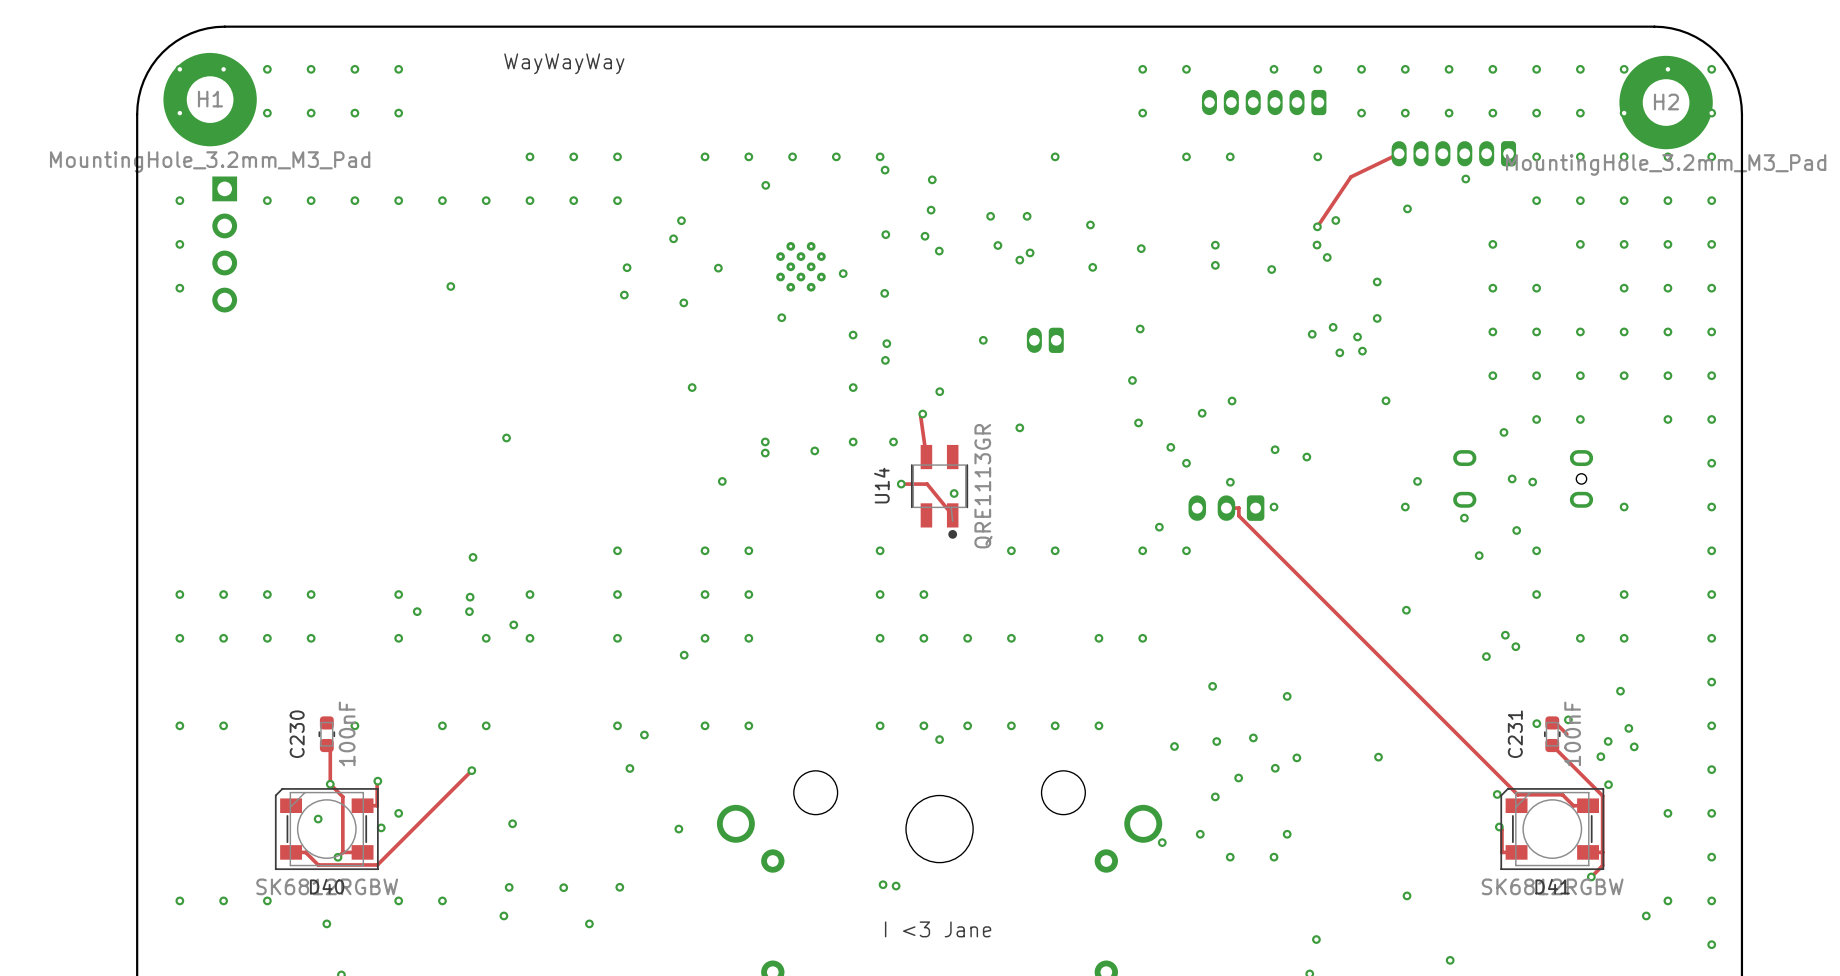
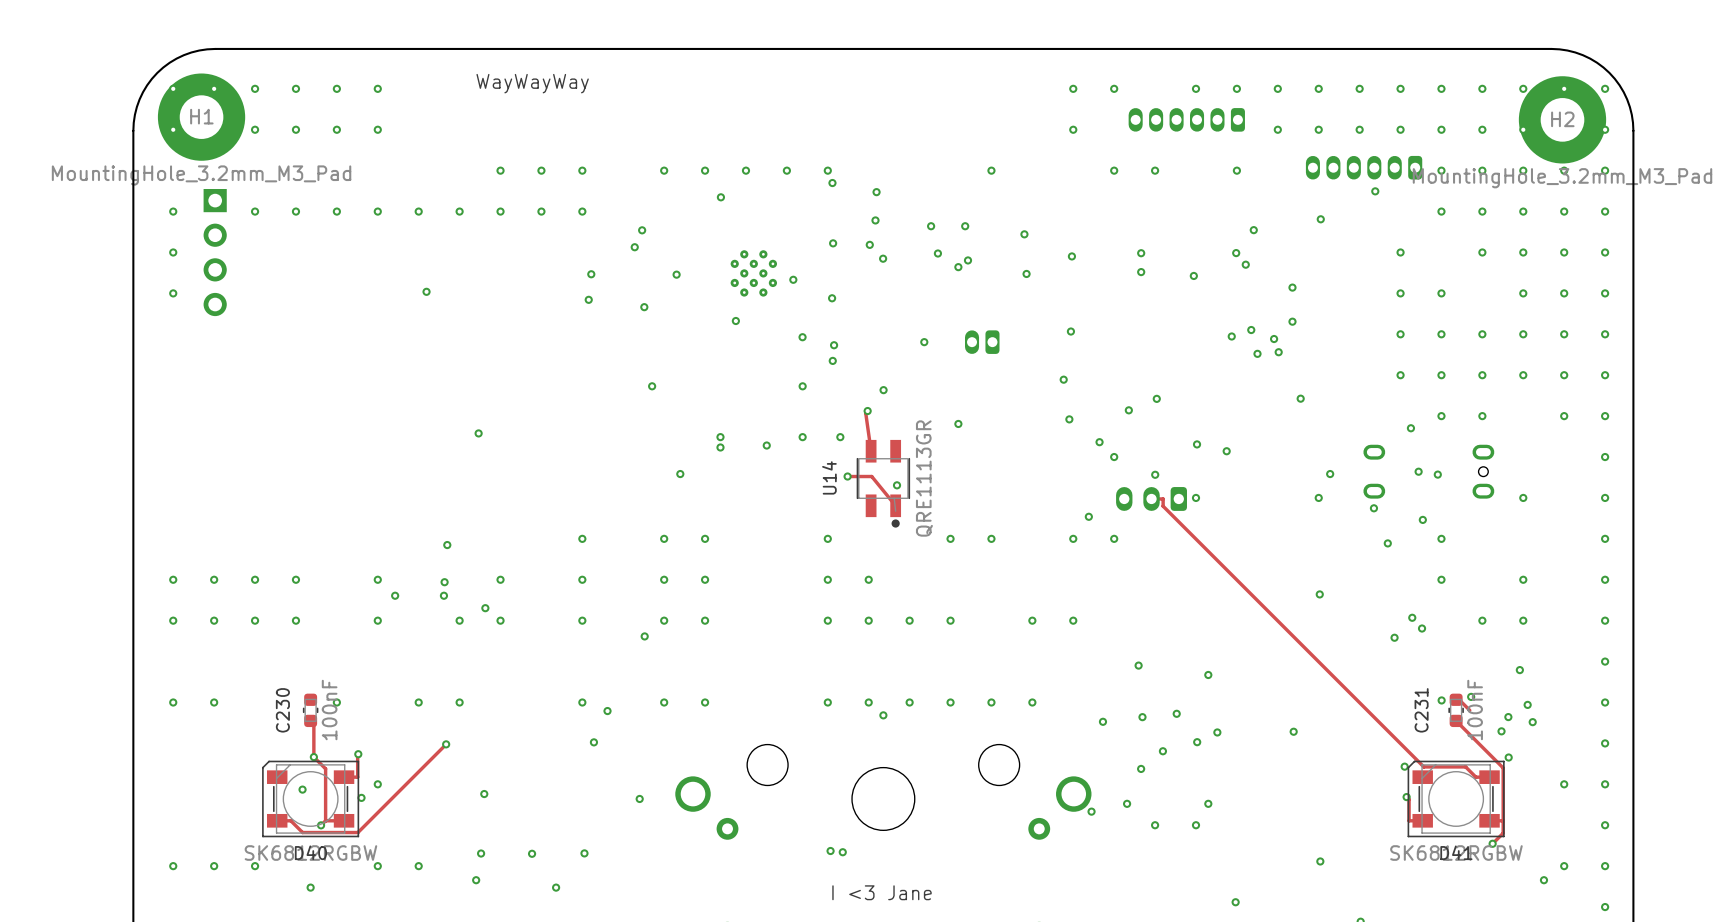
track: (1399, 153) (1350, 176) (1317, 226) -> none
via: (1317, 226) -> none

